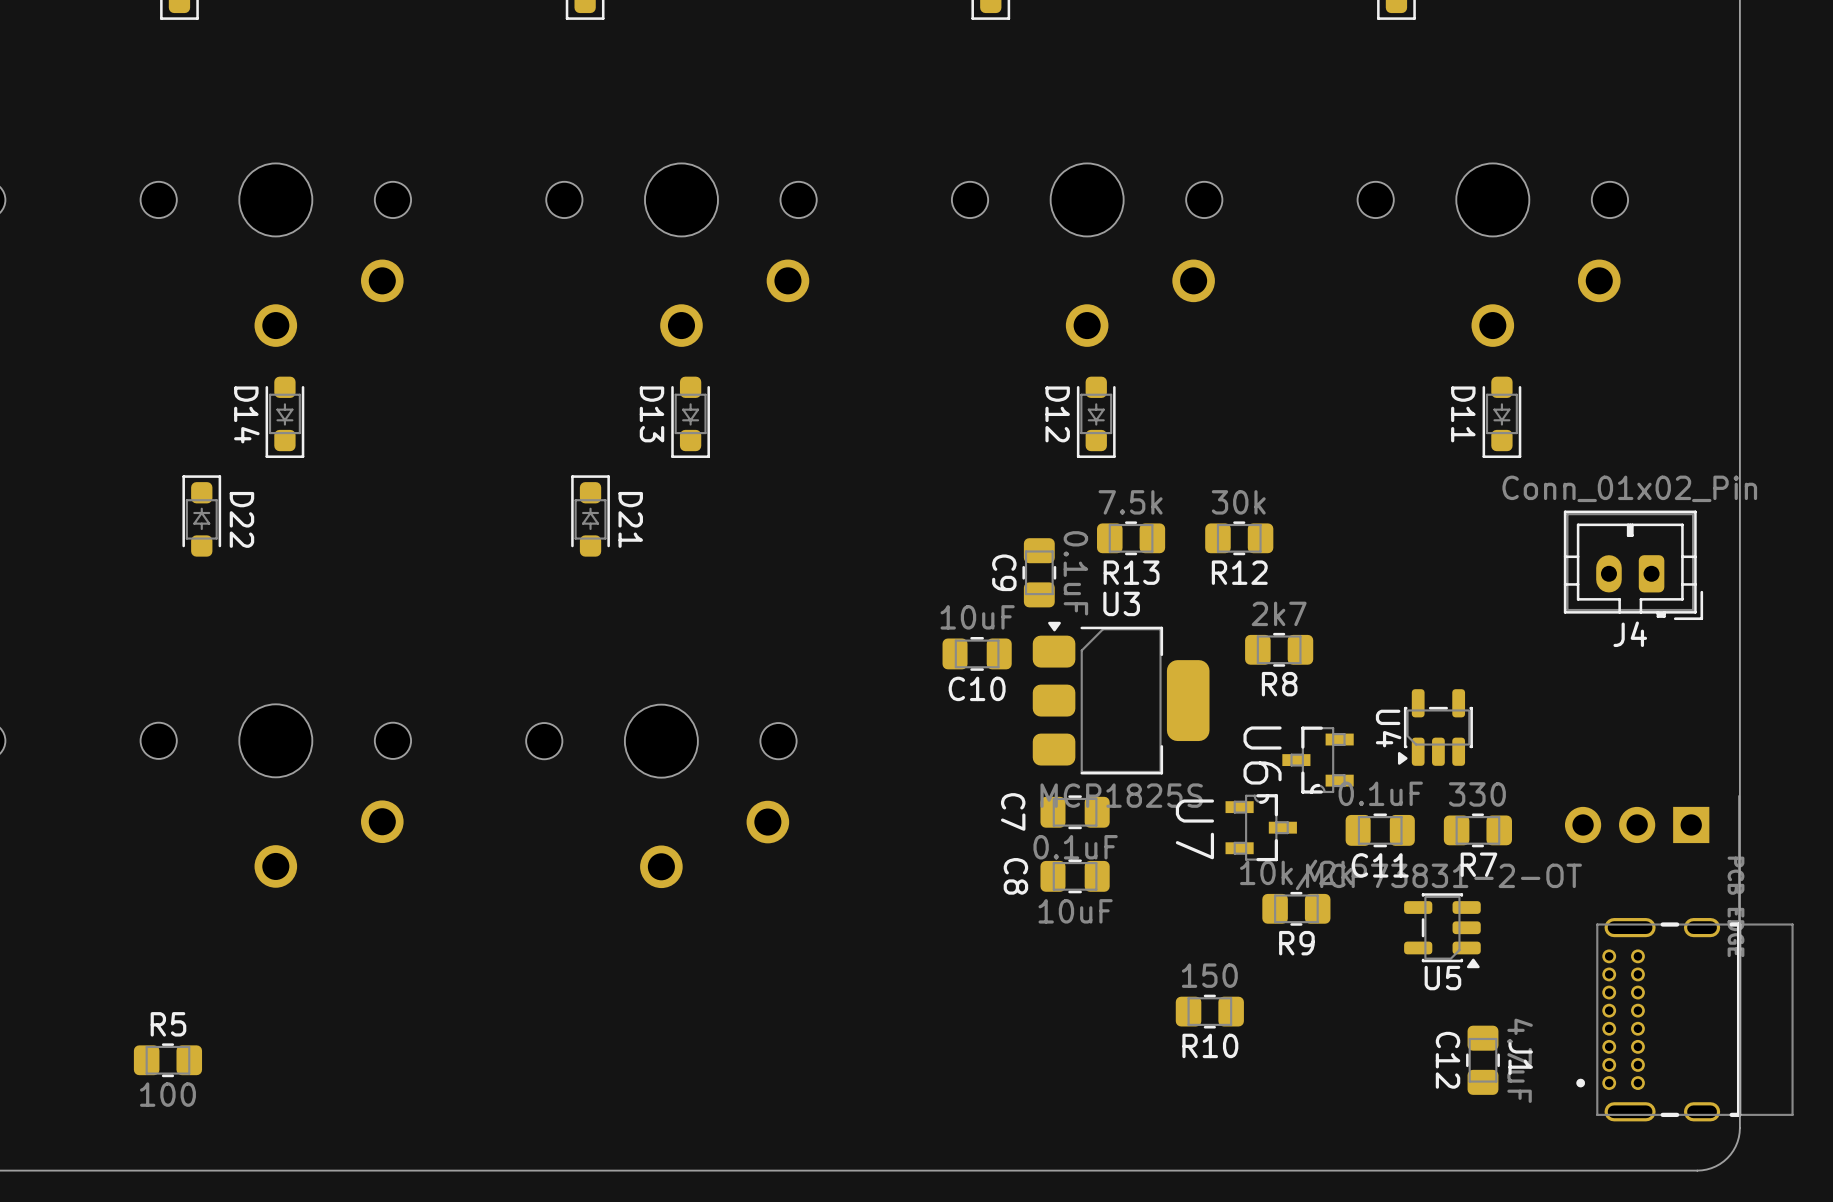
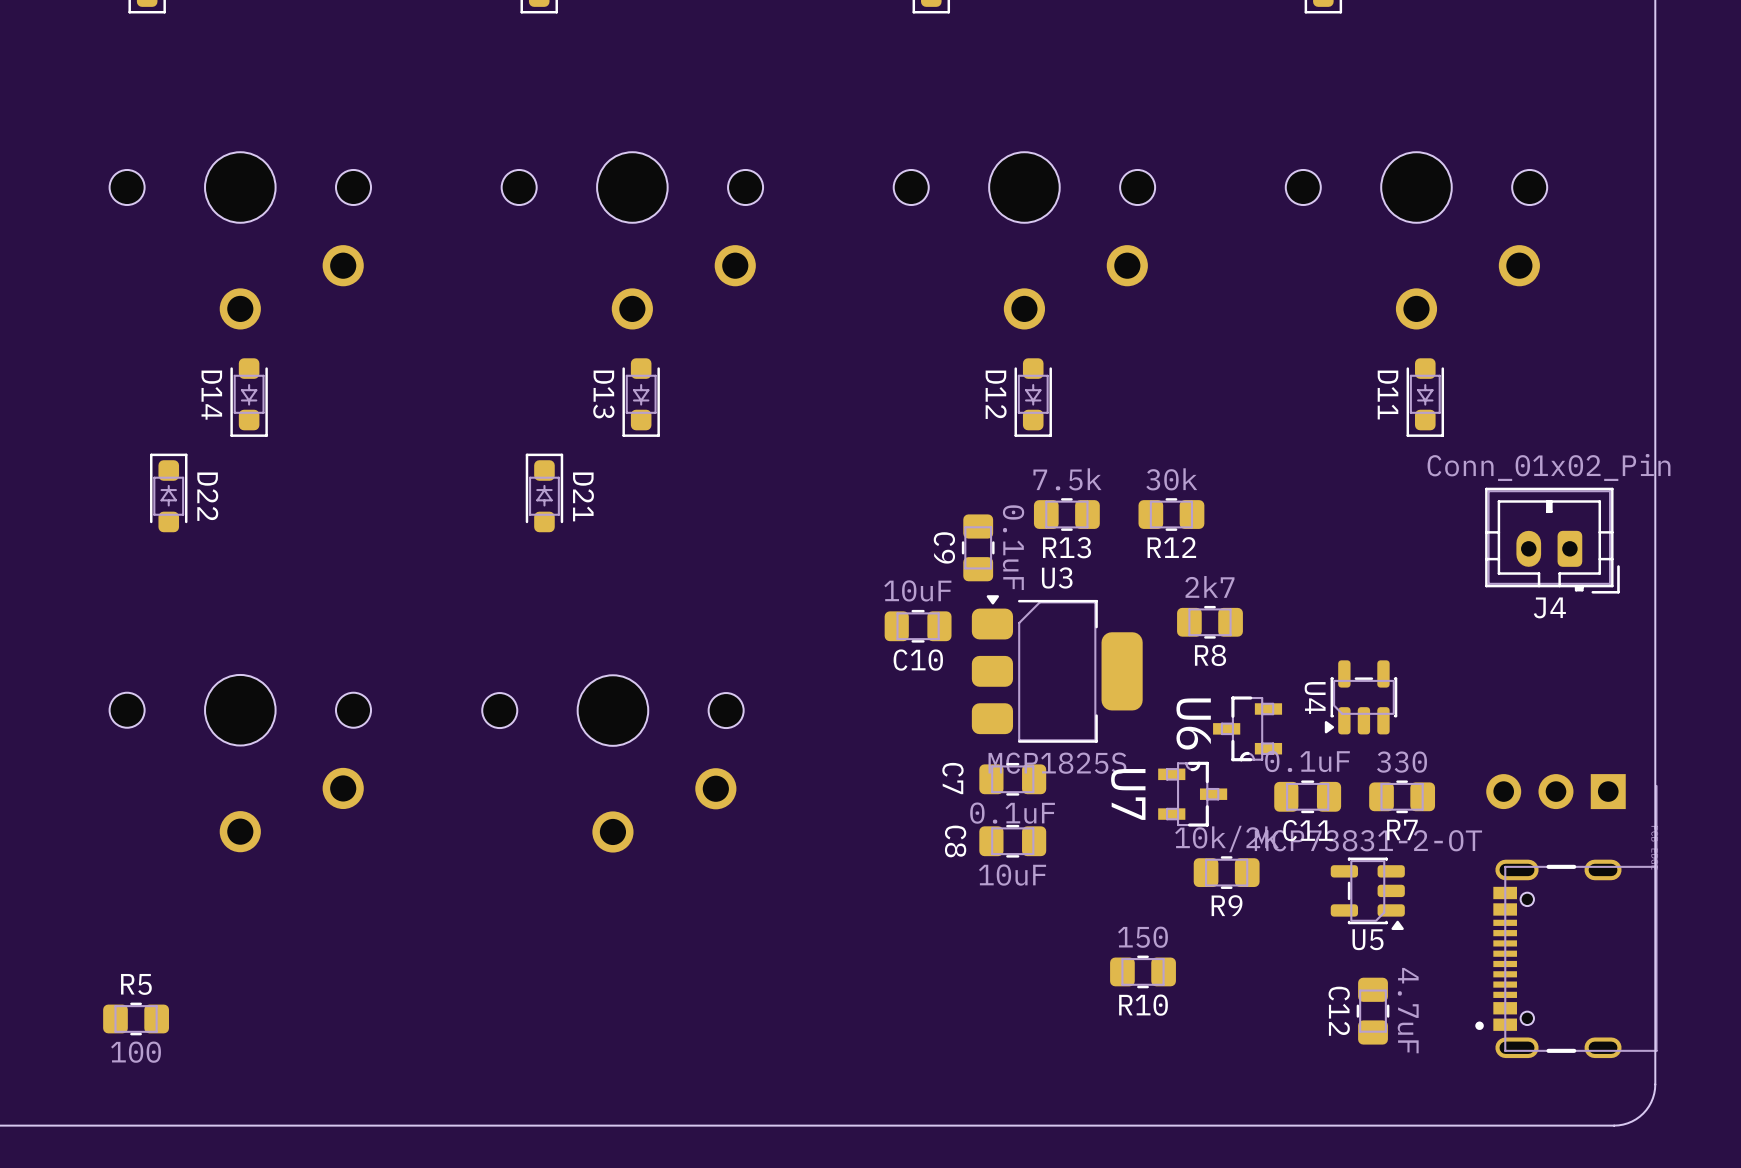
J1: (1685, 958) -> none
part: none -> (1566, 921)
C12 position: (1482, 1060) -> (1373, 1011)

